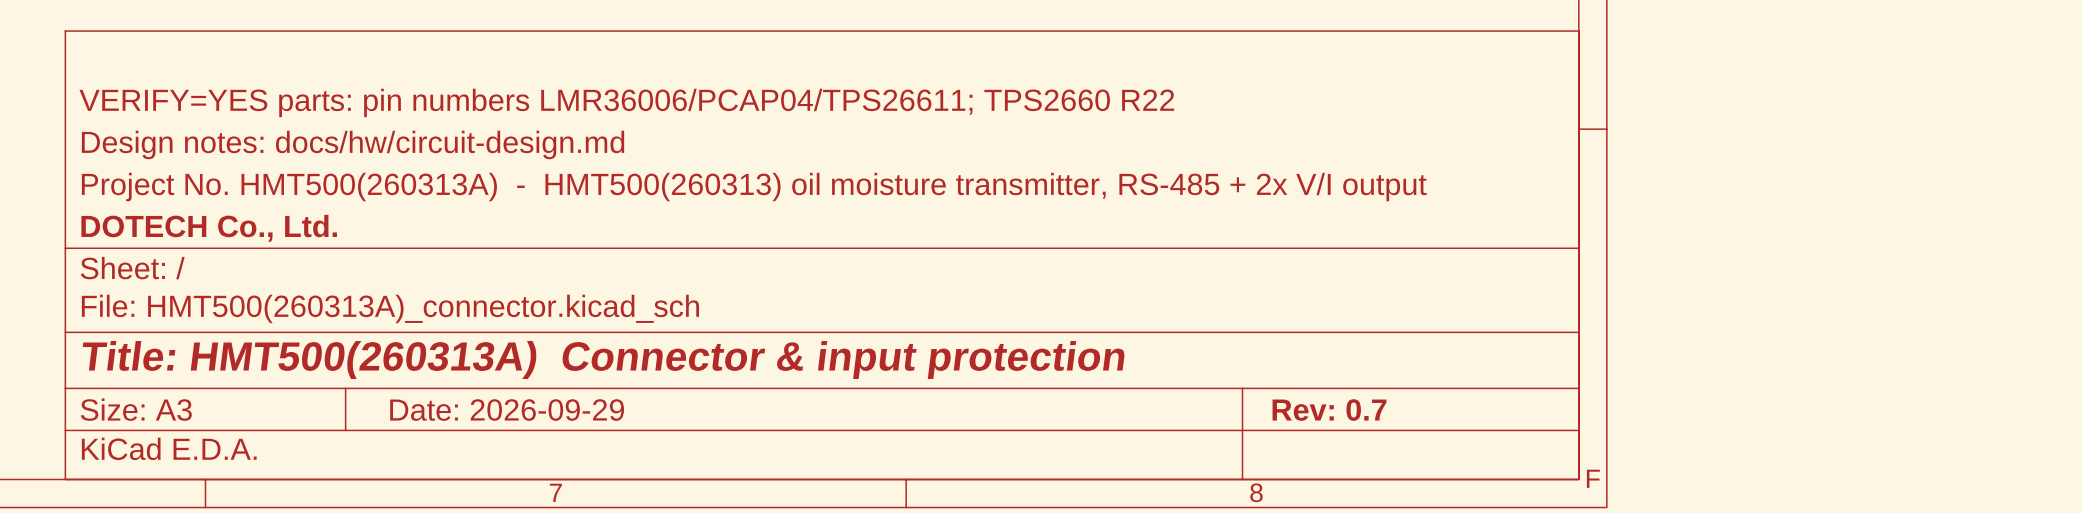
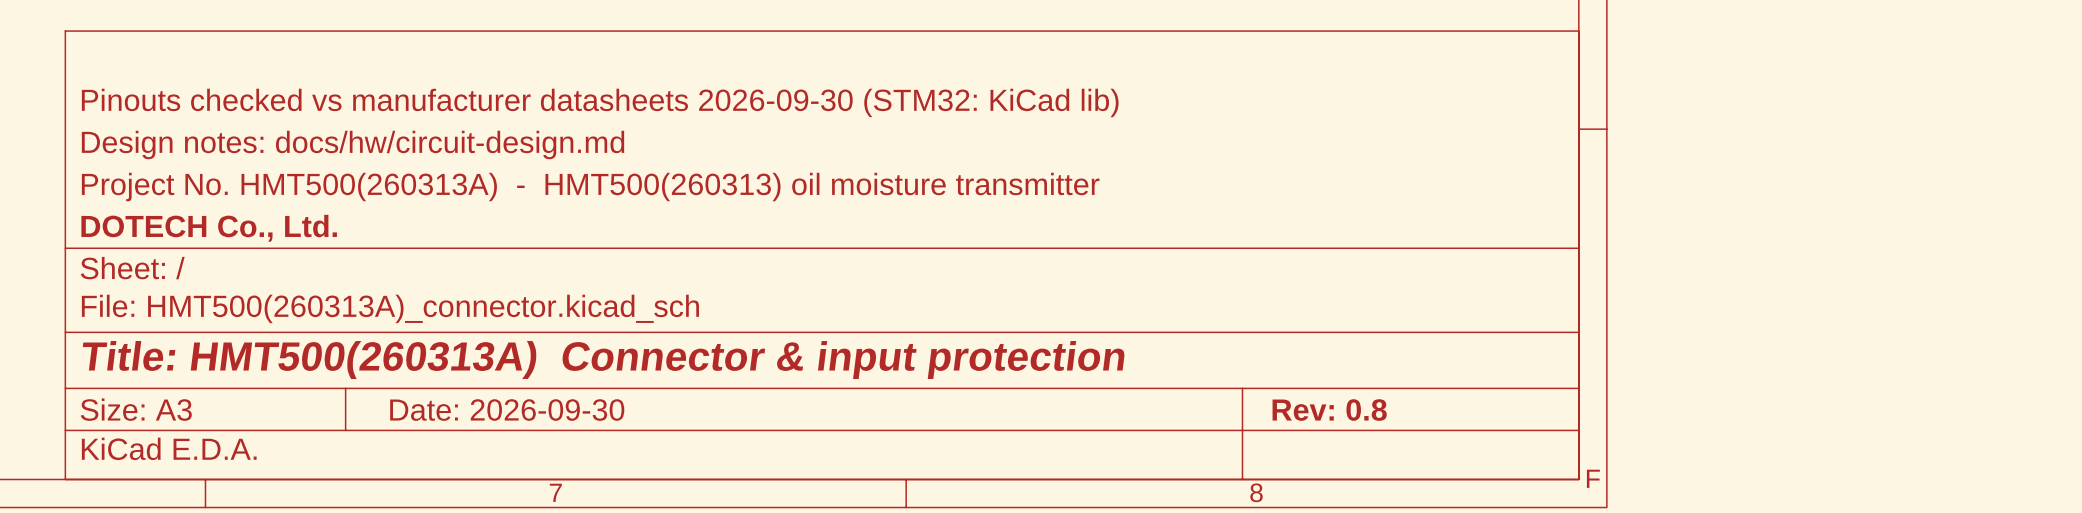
title block: VERIFY=YES parts: pin numbers LMR36006/PCAP04/TPS26611; TPS2660 R22 (626, 102) -> Pinouts checked vs manufacturer datasheets 2026-09-30 (STM32: KiCad lib) (600, 102)
title block: Project No. HMT500(260313A) - HMT500(260313) oil moisture transmitter, RS-485 + 2x V/I output (754, 187) -> Project No. HMT500(260313A) - HMT500(260313) oil moisture transmitter (590, 187)
title block: Date: 2026-09-29 (507, 410) -> Date: 2026-09-30 (507, 410)
title block: Rev: 0.7 (1329, 410) -> Rev: 0.8 (1329, 410)

